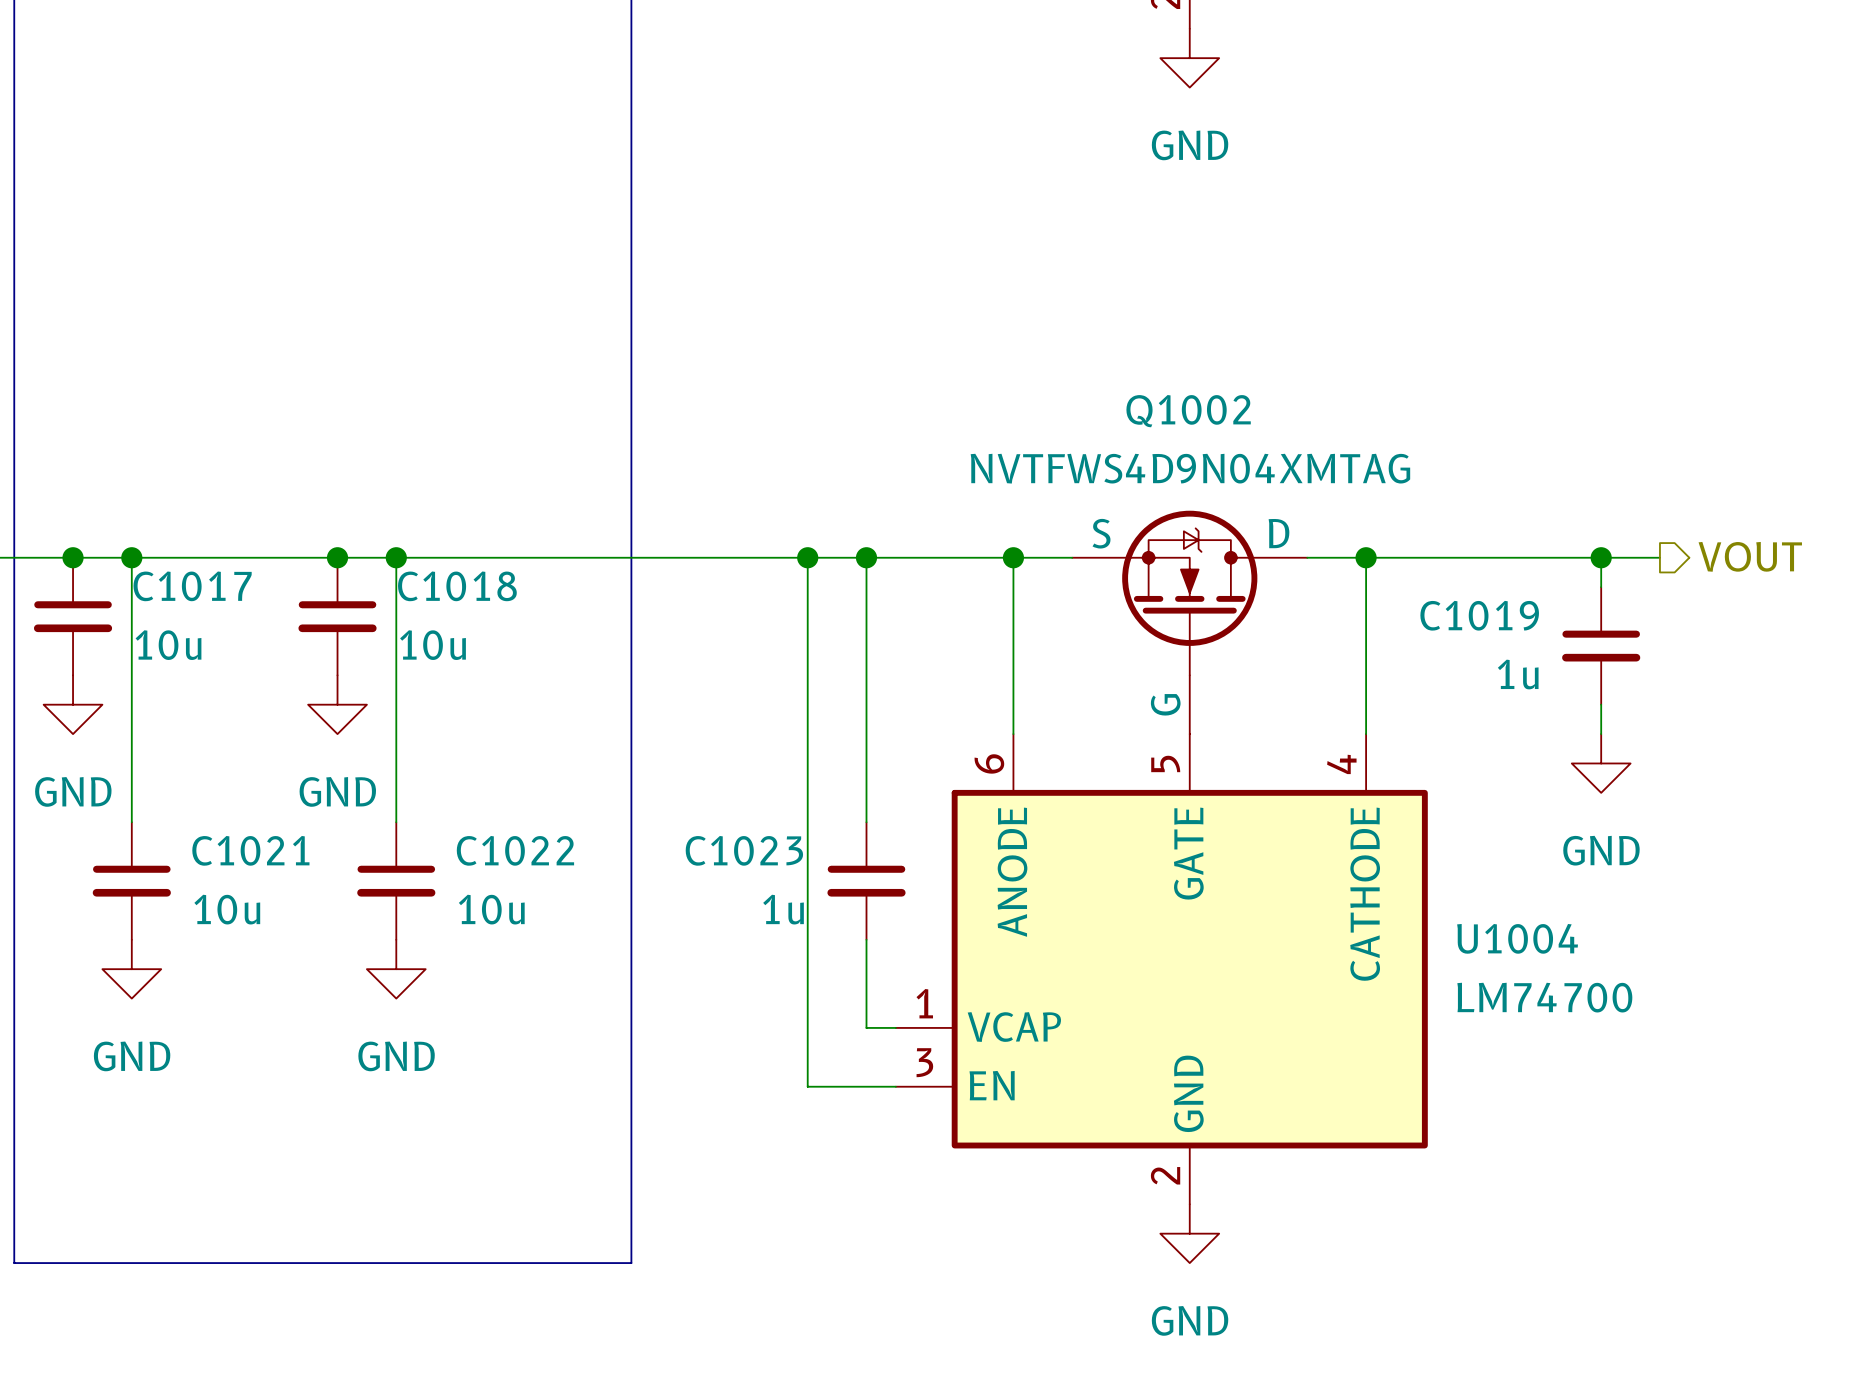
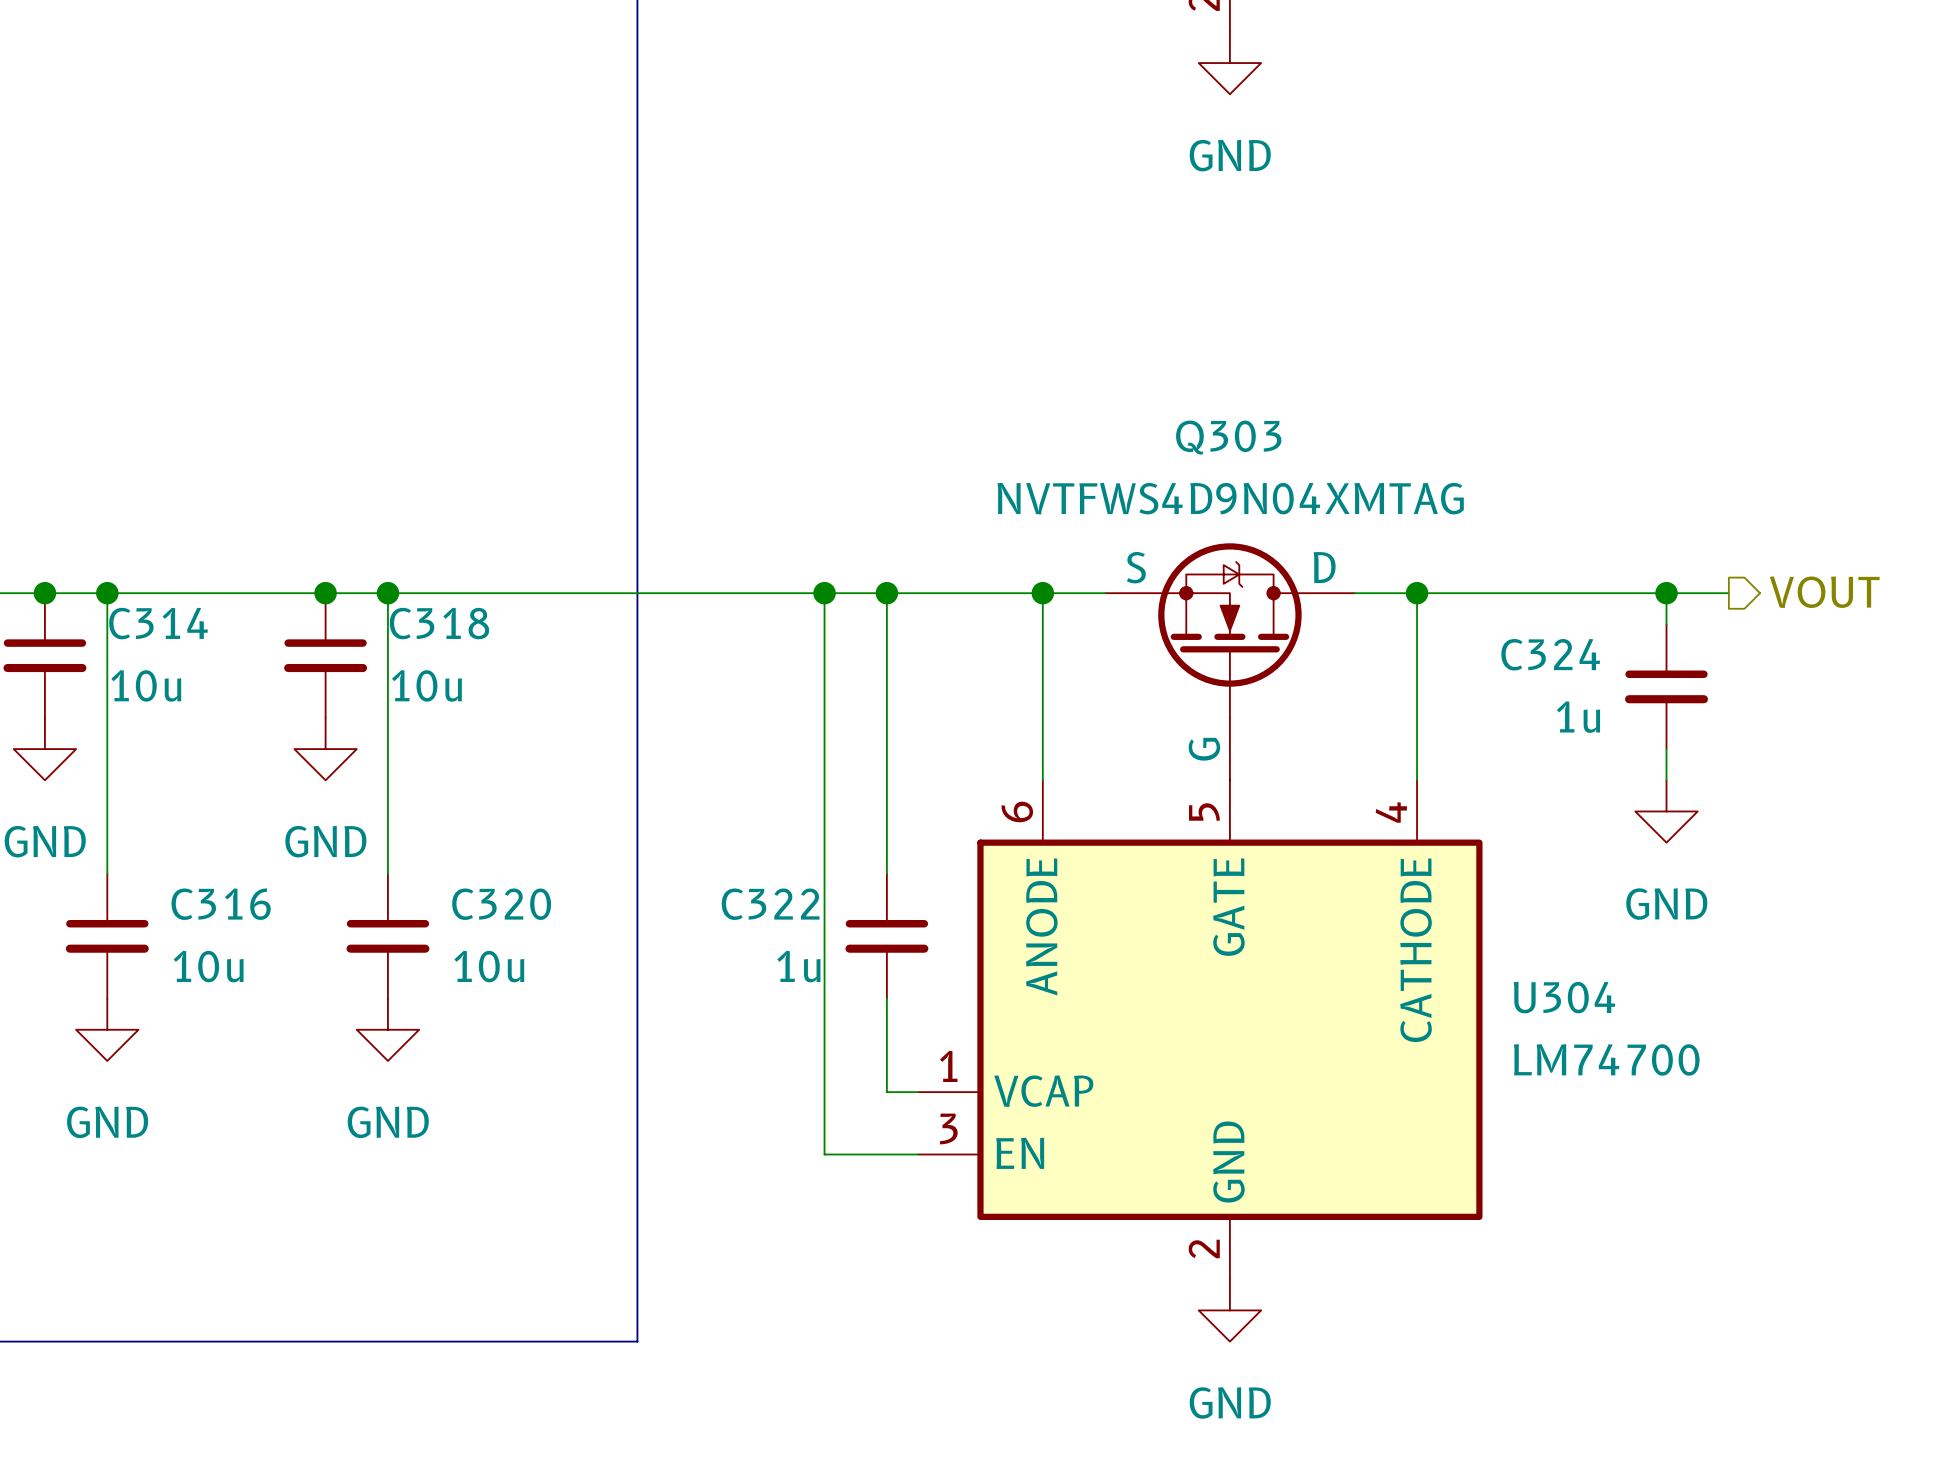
Q1002 name: Q1002 (1188, 411) -> Q303 (1228, 437)
C1017 name: C1017 (192, 586) -> C314 (158, 623)
C1018 name: C1018 (457, 586) -> C318 (439, 623)
C1019 name: C1019 (1479, 615) -> C324 (1550, 654)
C1021 name: C1021 (250, 850) -> C316 (221, 904)
C1022 name: C1022 (515, 850) -> C320 (501, 904)
C1023 name: C1023 (744, 850) -> C322 (770, 904)
U1004 name: U1004 (1517, 938) -> U304 (1564, 997)

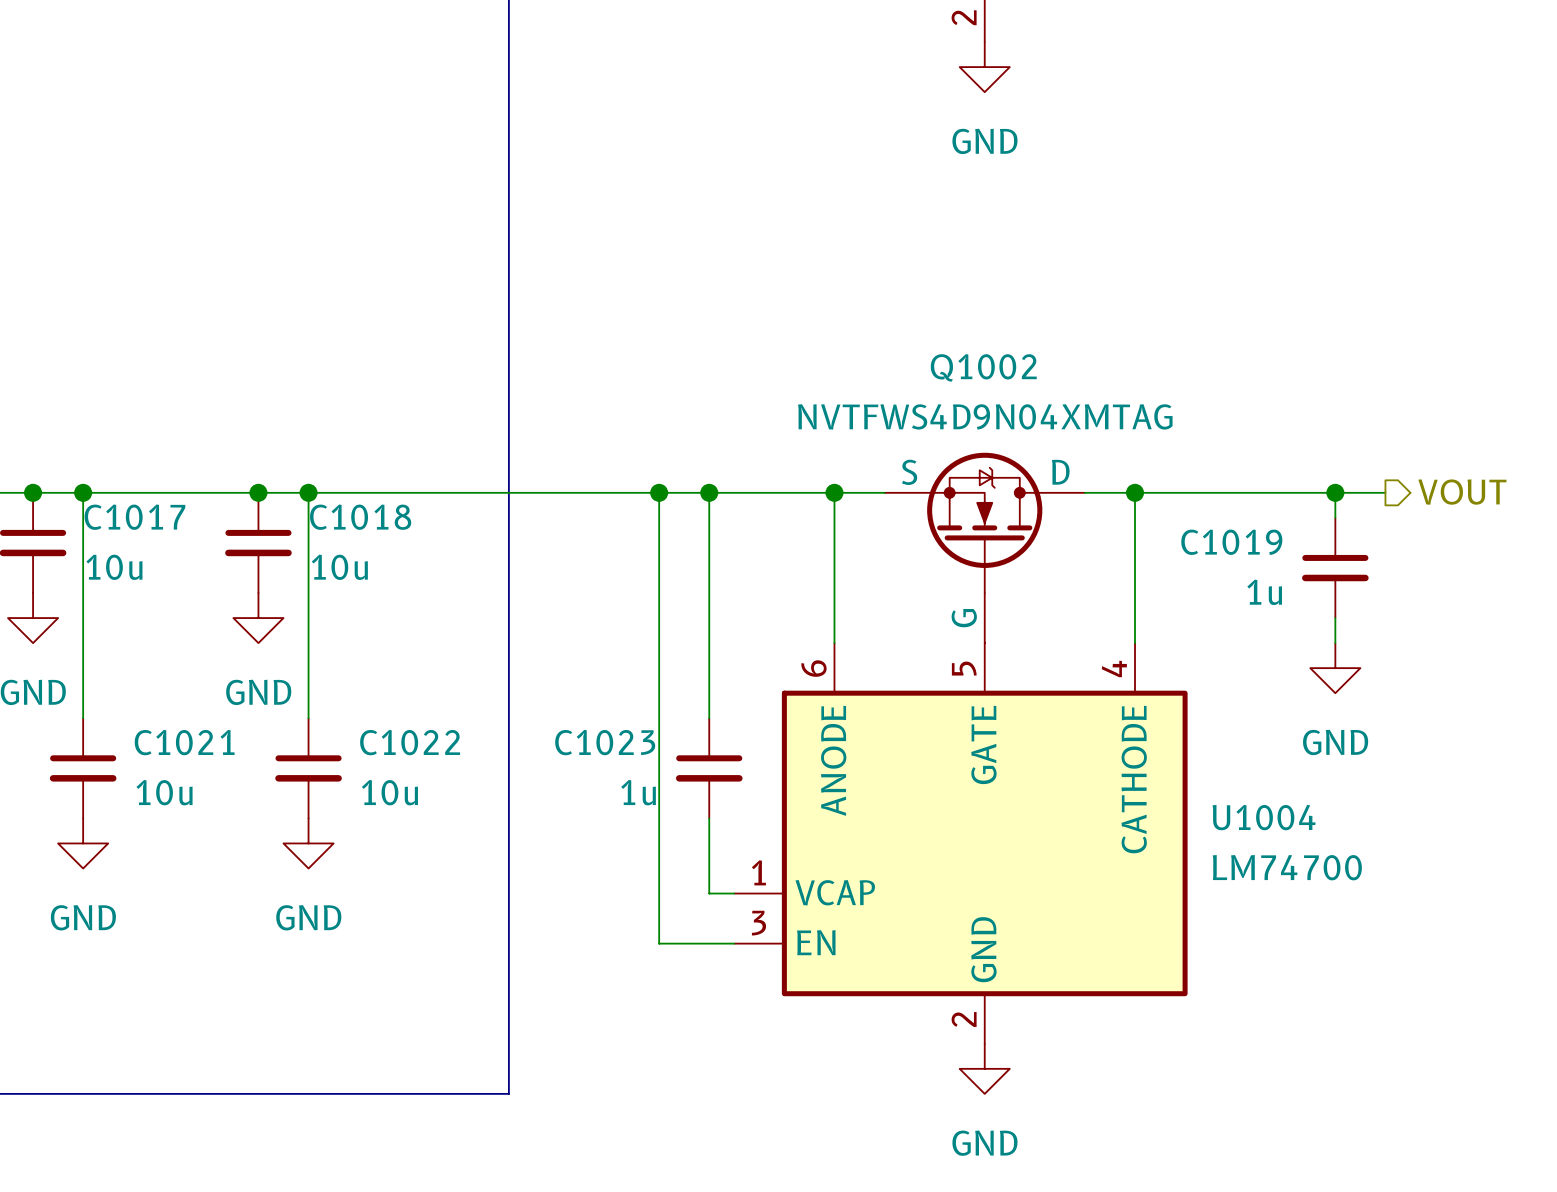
Q303 name: Q303 (1228, 437) -> Q1002 (983, 367)
C314 name: C314 (158, 623) -> C1017 (134, 517)
C318 name: C318 (439, 623) -> C1018 (360, 517)
C324 name: C324 (1550, 654) -> C1019 (1231, 542)
C316 name: C316 (221, 904) -> C1021 (184, 742)
C320 name: C320 (501, 904) -> C1022 (410, 742)
C322 name: C322 (770, 904) -> C1023 (605, 742)
U304 name: U304 (1564, 997) -> U1004 (1264, 817)

